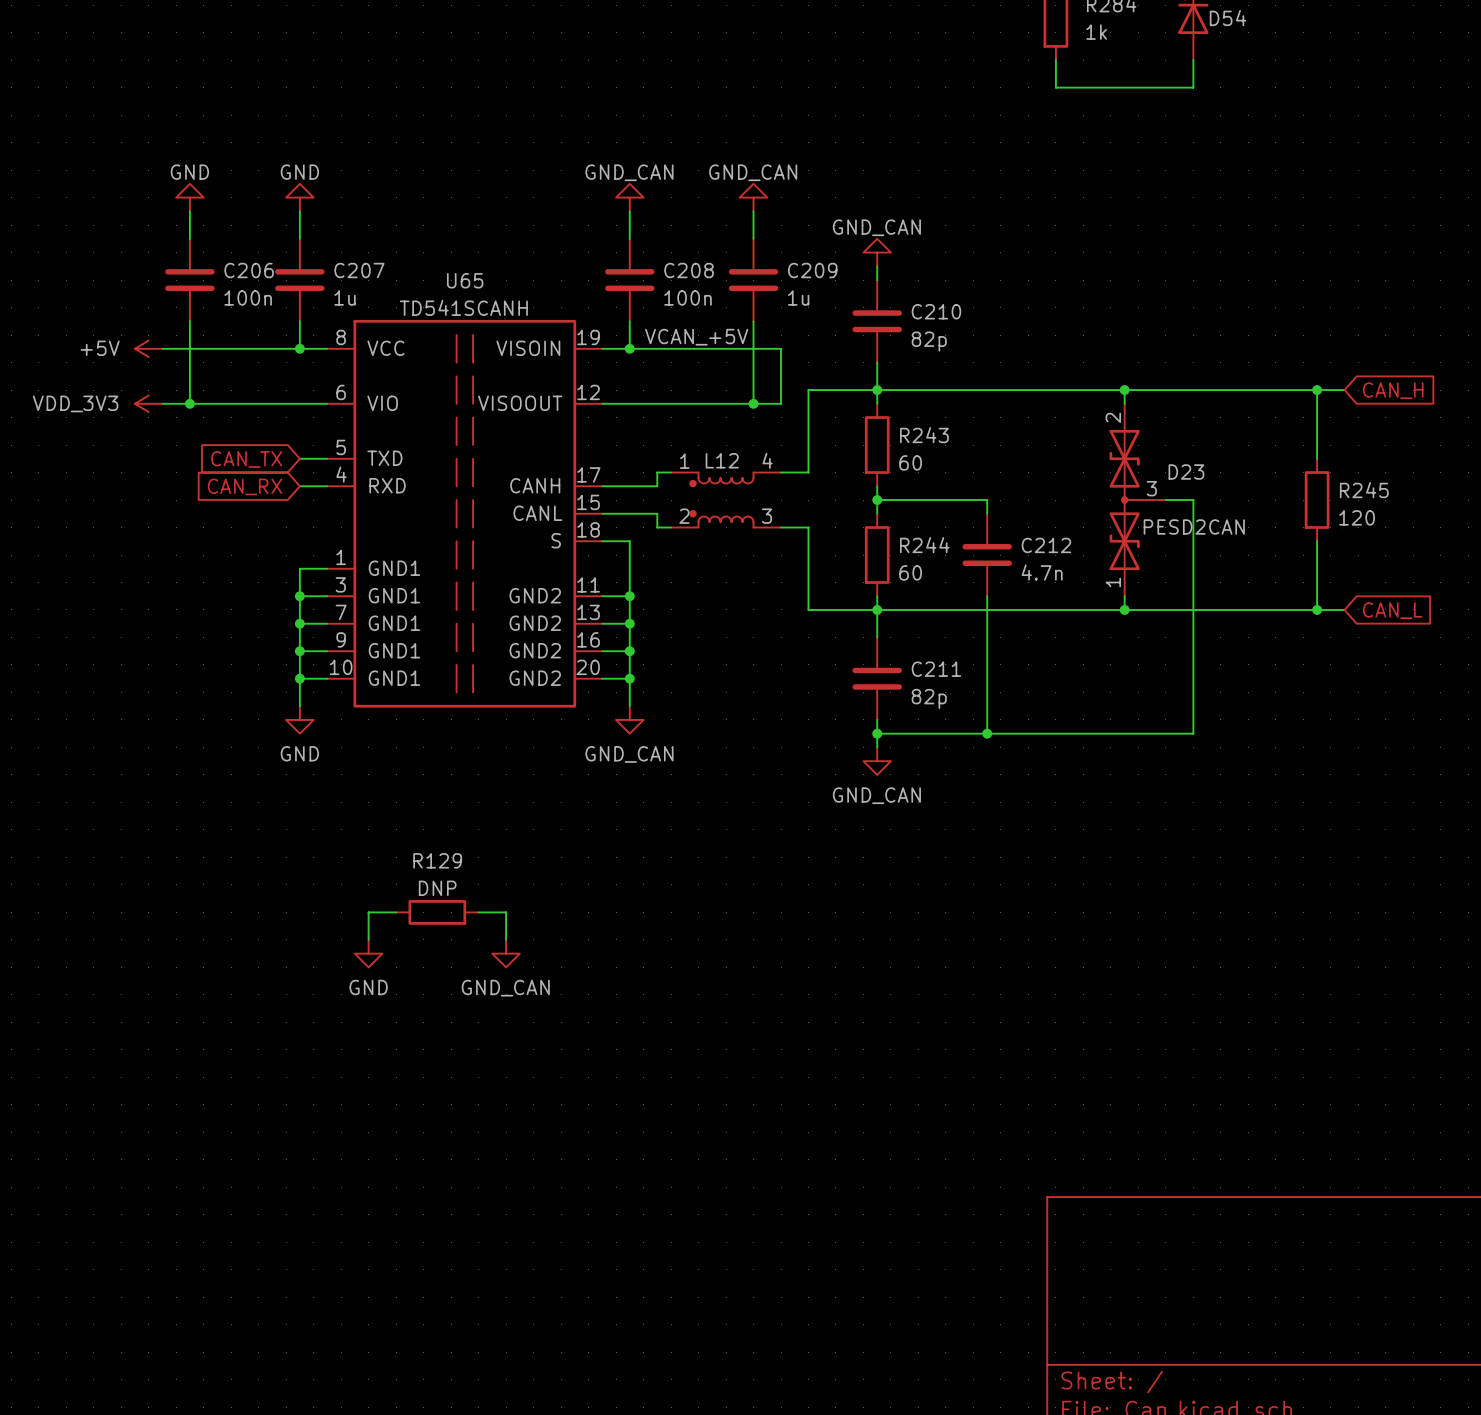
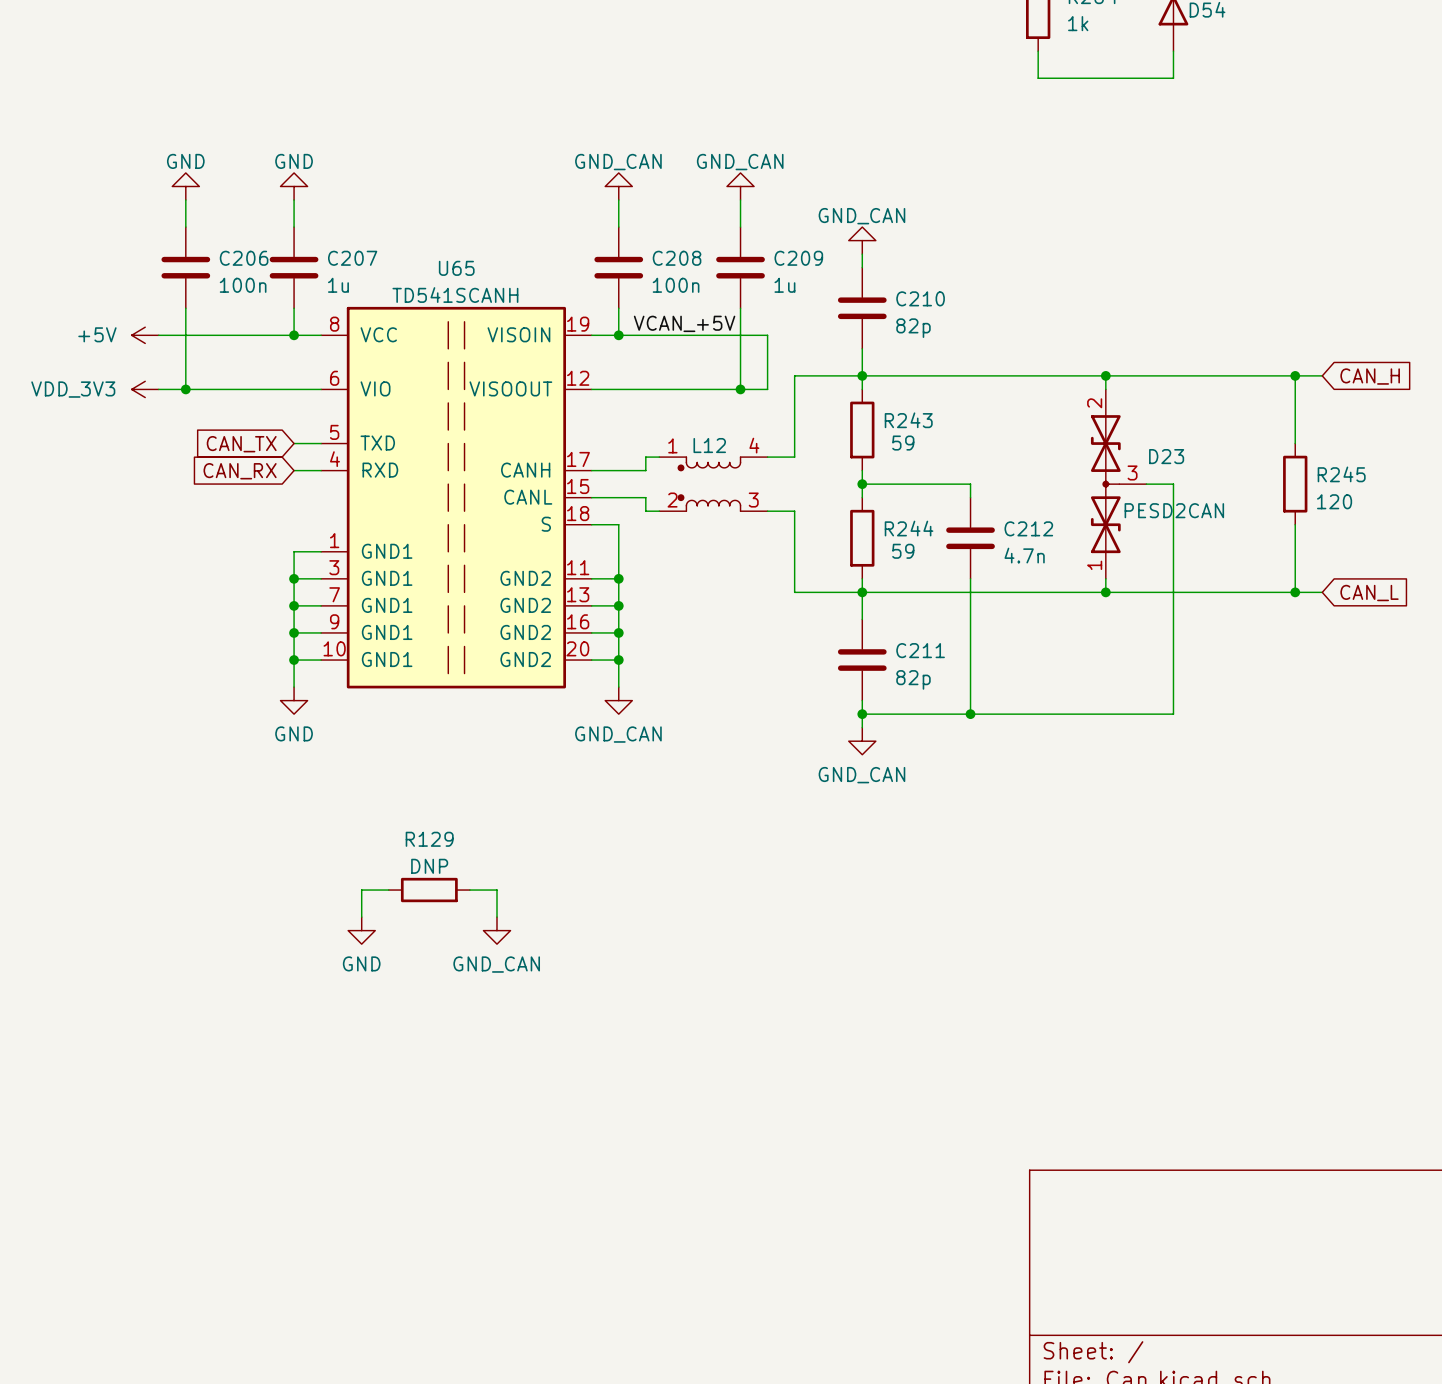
R243 value: 60 (910, 462) -> 59 (903, 443)
R244 value: 60 (910, 572) -> 59 (903, 551)

